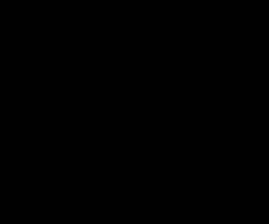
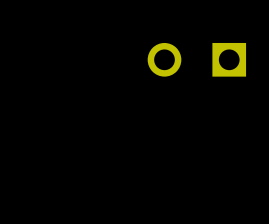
part: none -> (196, 59)

